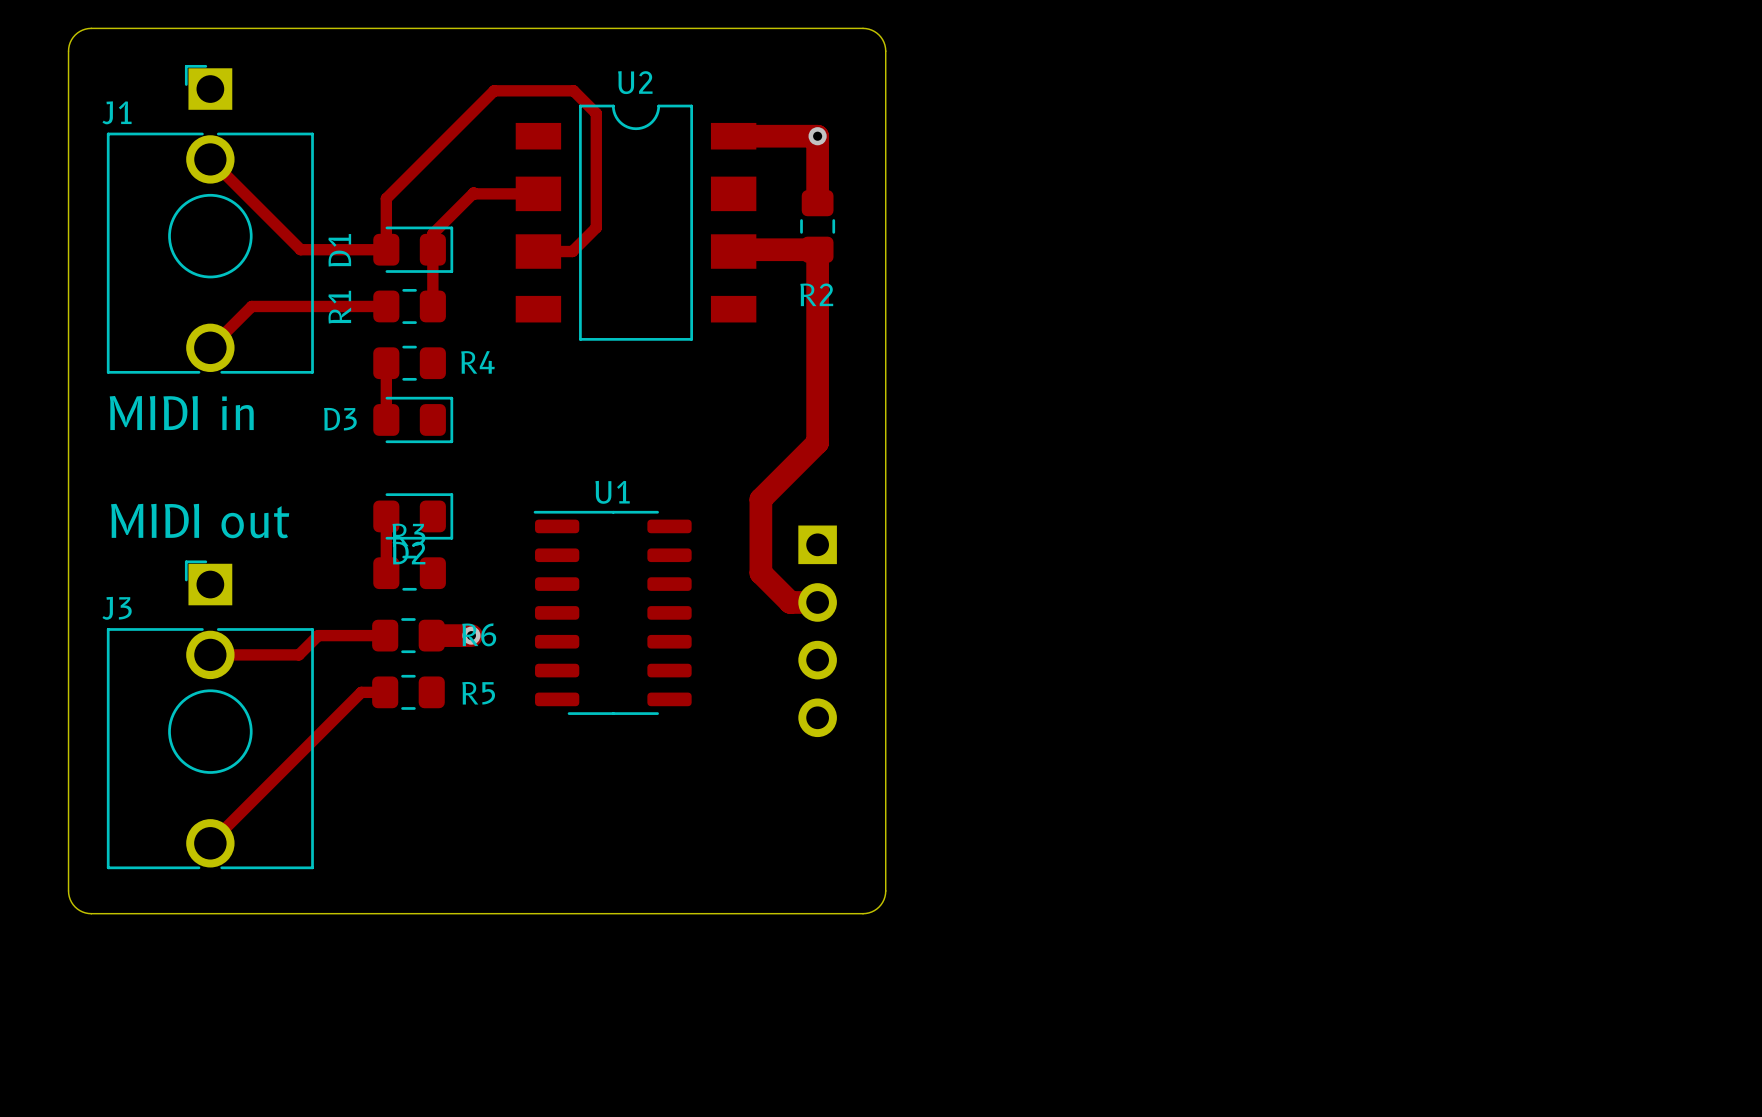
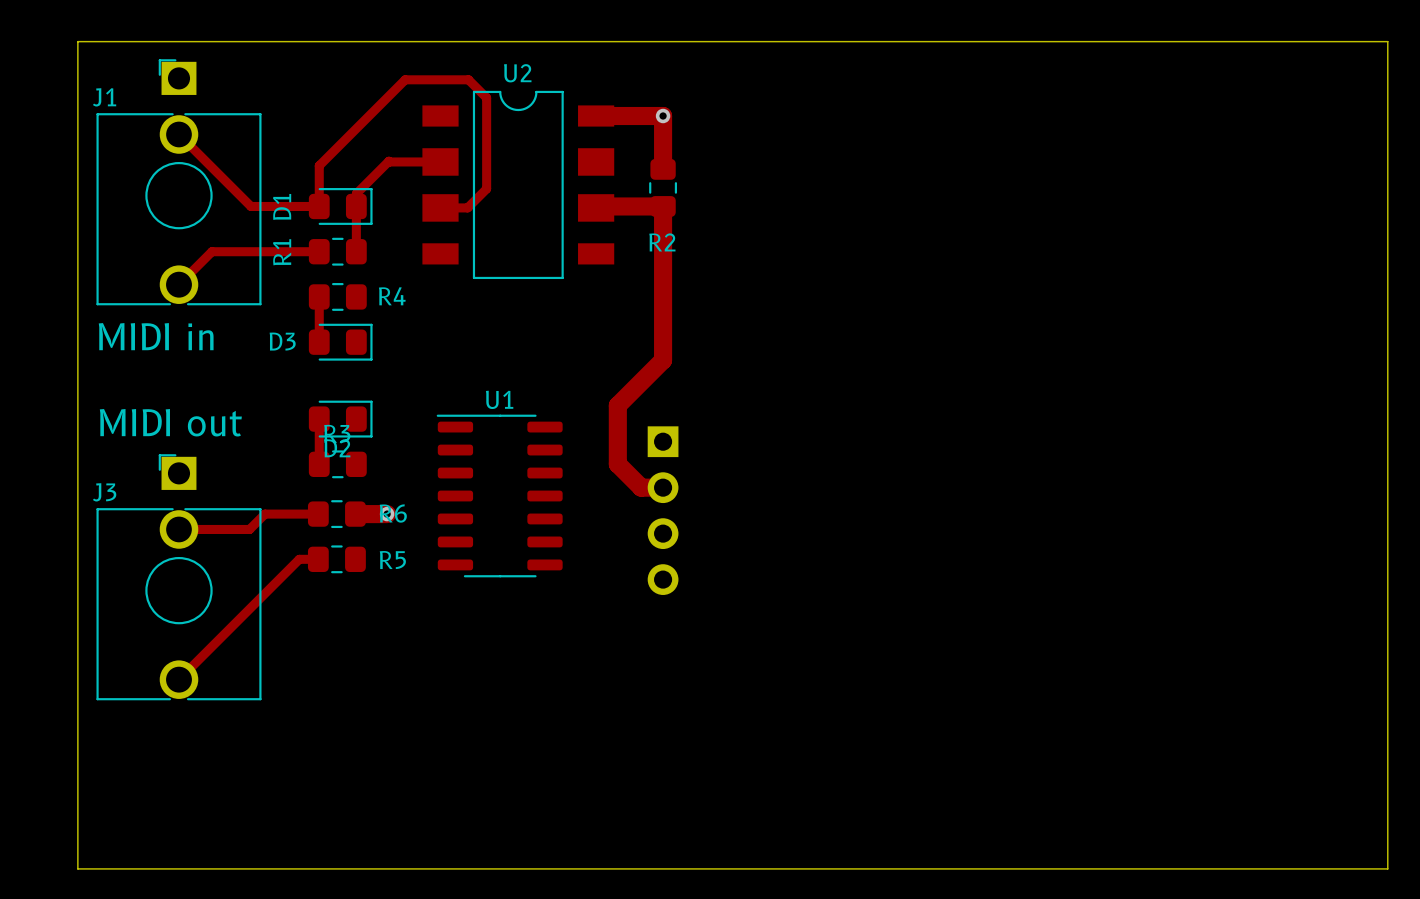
board edge: (91, 28) (863, 28) (871, 30) (879, 35) (883, 42) (885, 51) (885, 890) (883, 899) (879, 907) (871, 911) (863, 913) (91, 913) (82, 911) (75, 907) (70, 899) (68, 890) (68, 51) (70, 42) (75, 35) (82, 30) (91, 28) -> none
board edge: none -> (77, 41) (77, 868) (1387, 868) (1387, 41) (77, 41)

